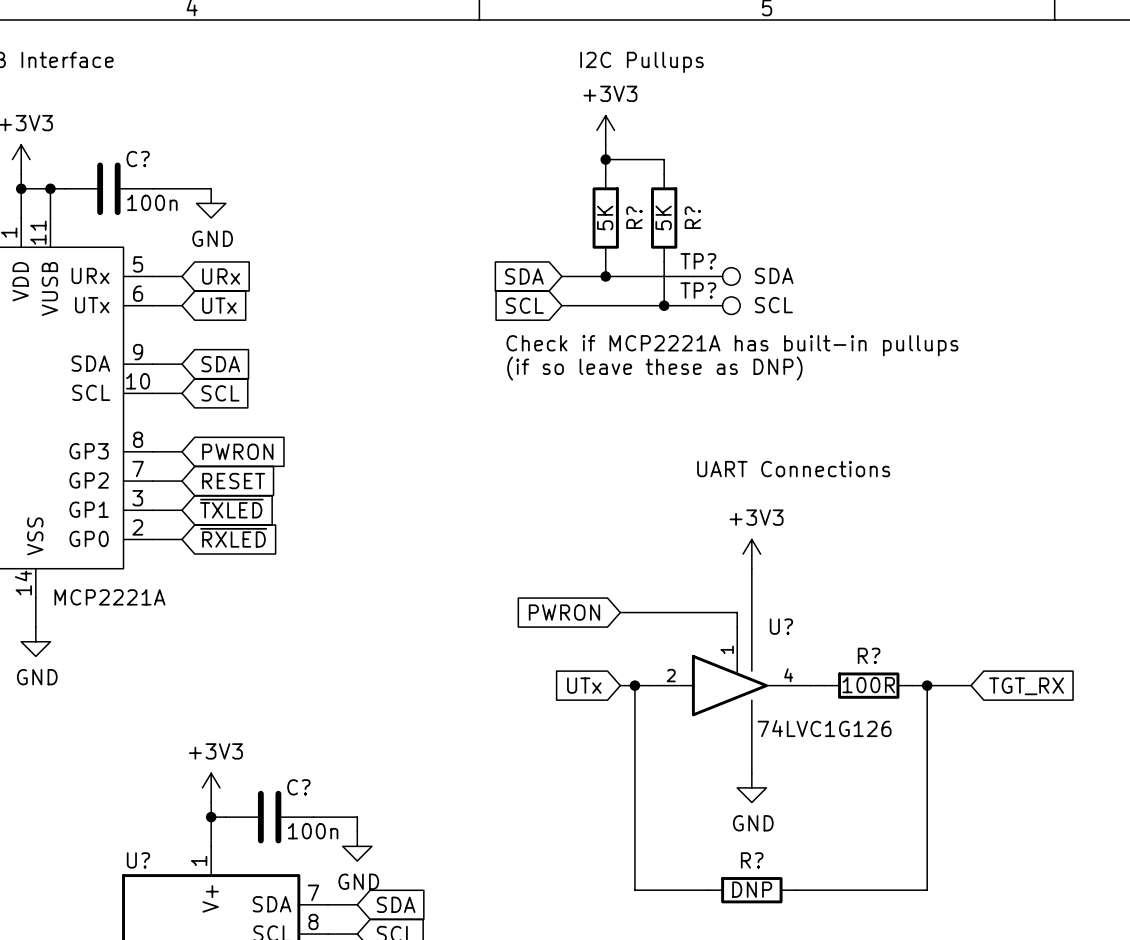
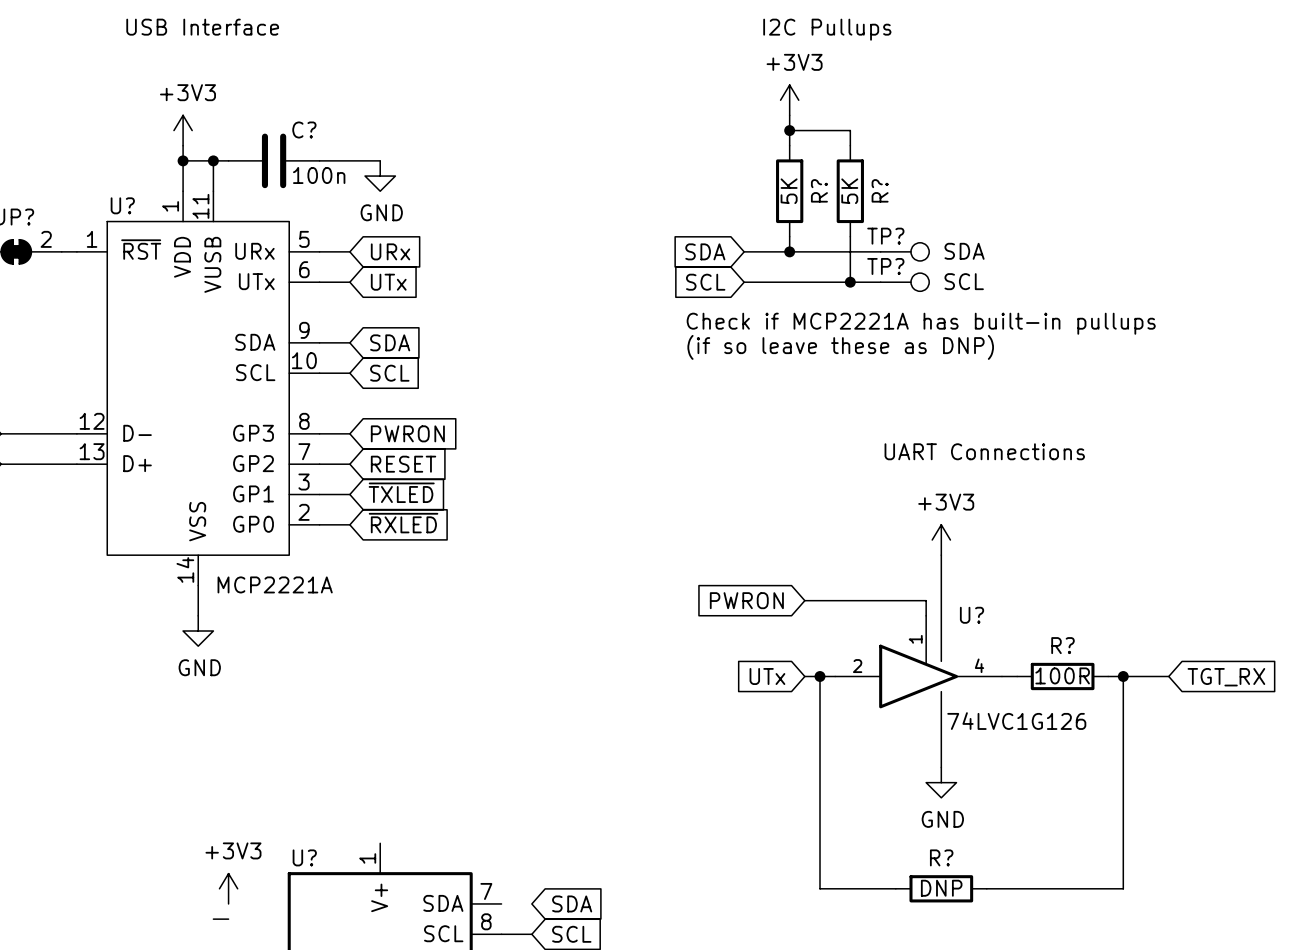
power symbol position: +3V3 (211, 787) -> +3V3 (228, 888)
wire: (211, 802) (211, 846) -> none
wire: (211, 817) (225, 817) -> (213, 919) (228, 919)
junction: (211, 817) -> none
C?: 100n (269, 817) -> none
wire: (313, 817) (357, 817) (357, 831) -> none
power symbol: GND (357, 846) -> none
wire: (328, 904) (357, 904) -> none

